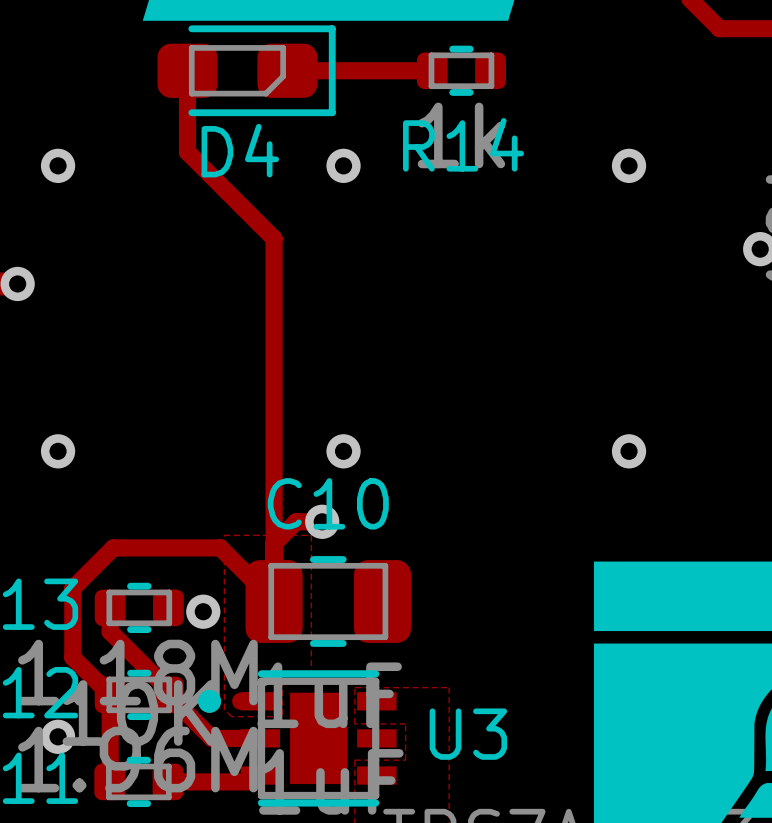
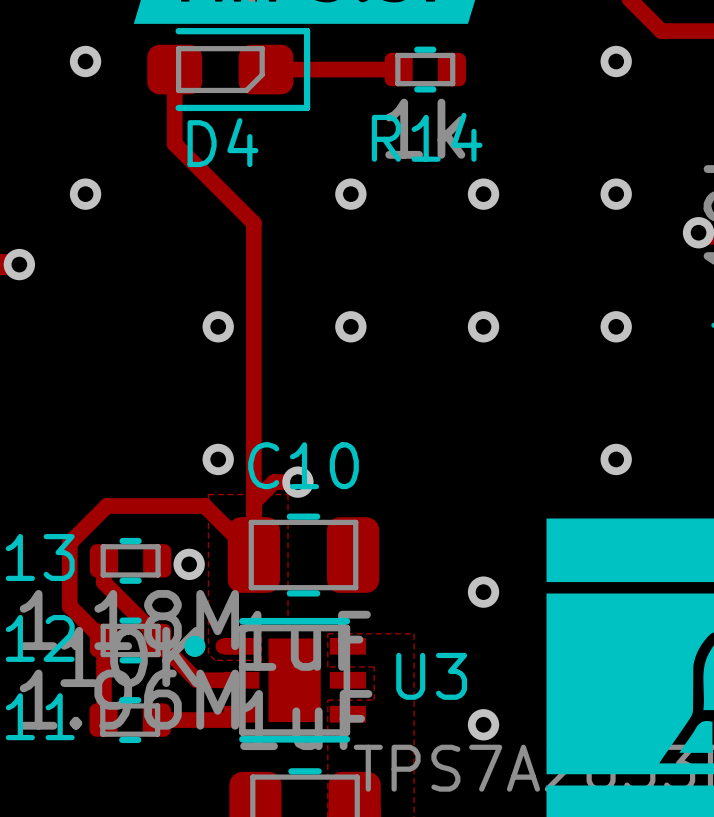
via: none -> (85, 61)
via: none -> (616, 61)
via position: (58, 165) -> (85, 194)
via position: (343, 165) -> (350, 194)
via: (629, 165) -> none
via: none -> (483, 194)
via: none -> (616, 194)
via: none -> (218, 326)
via: none -> (350, 326)
via: none -> (483, 326)
via: none -> (616, 326)
via: (58, 451) -> none
via: (343, 451) -> none
via: (629, 451) -> none
via: none -> (218, 459)
via: none -> (616, 459)
via: none -> (483, 592)
via: (58, 736) -> none
via: none -> (483, 724)

